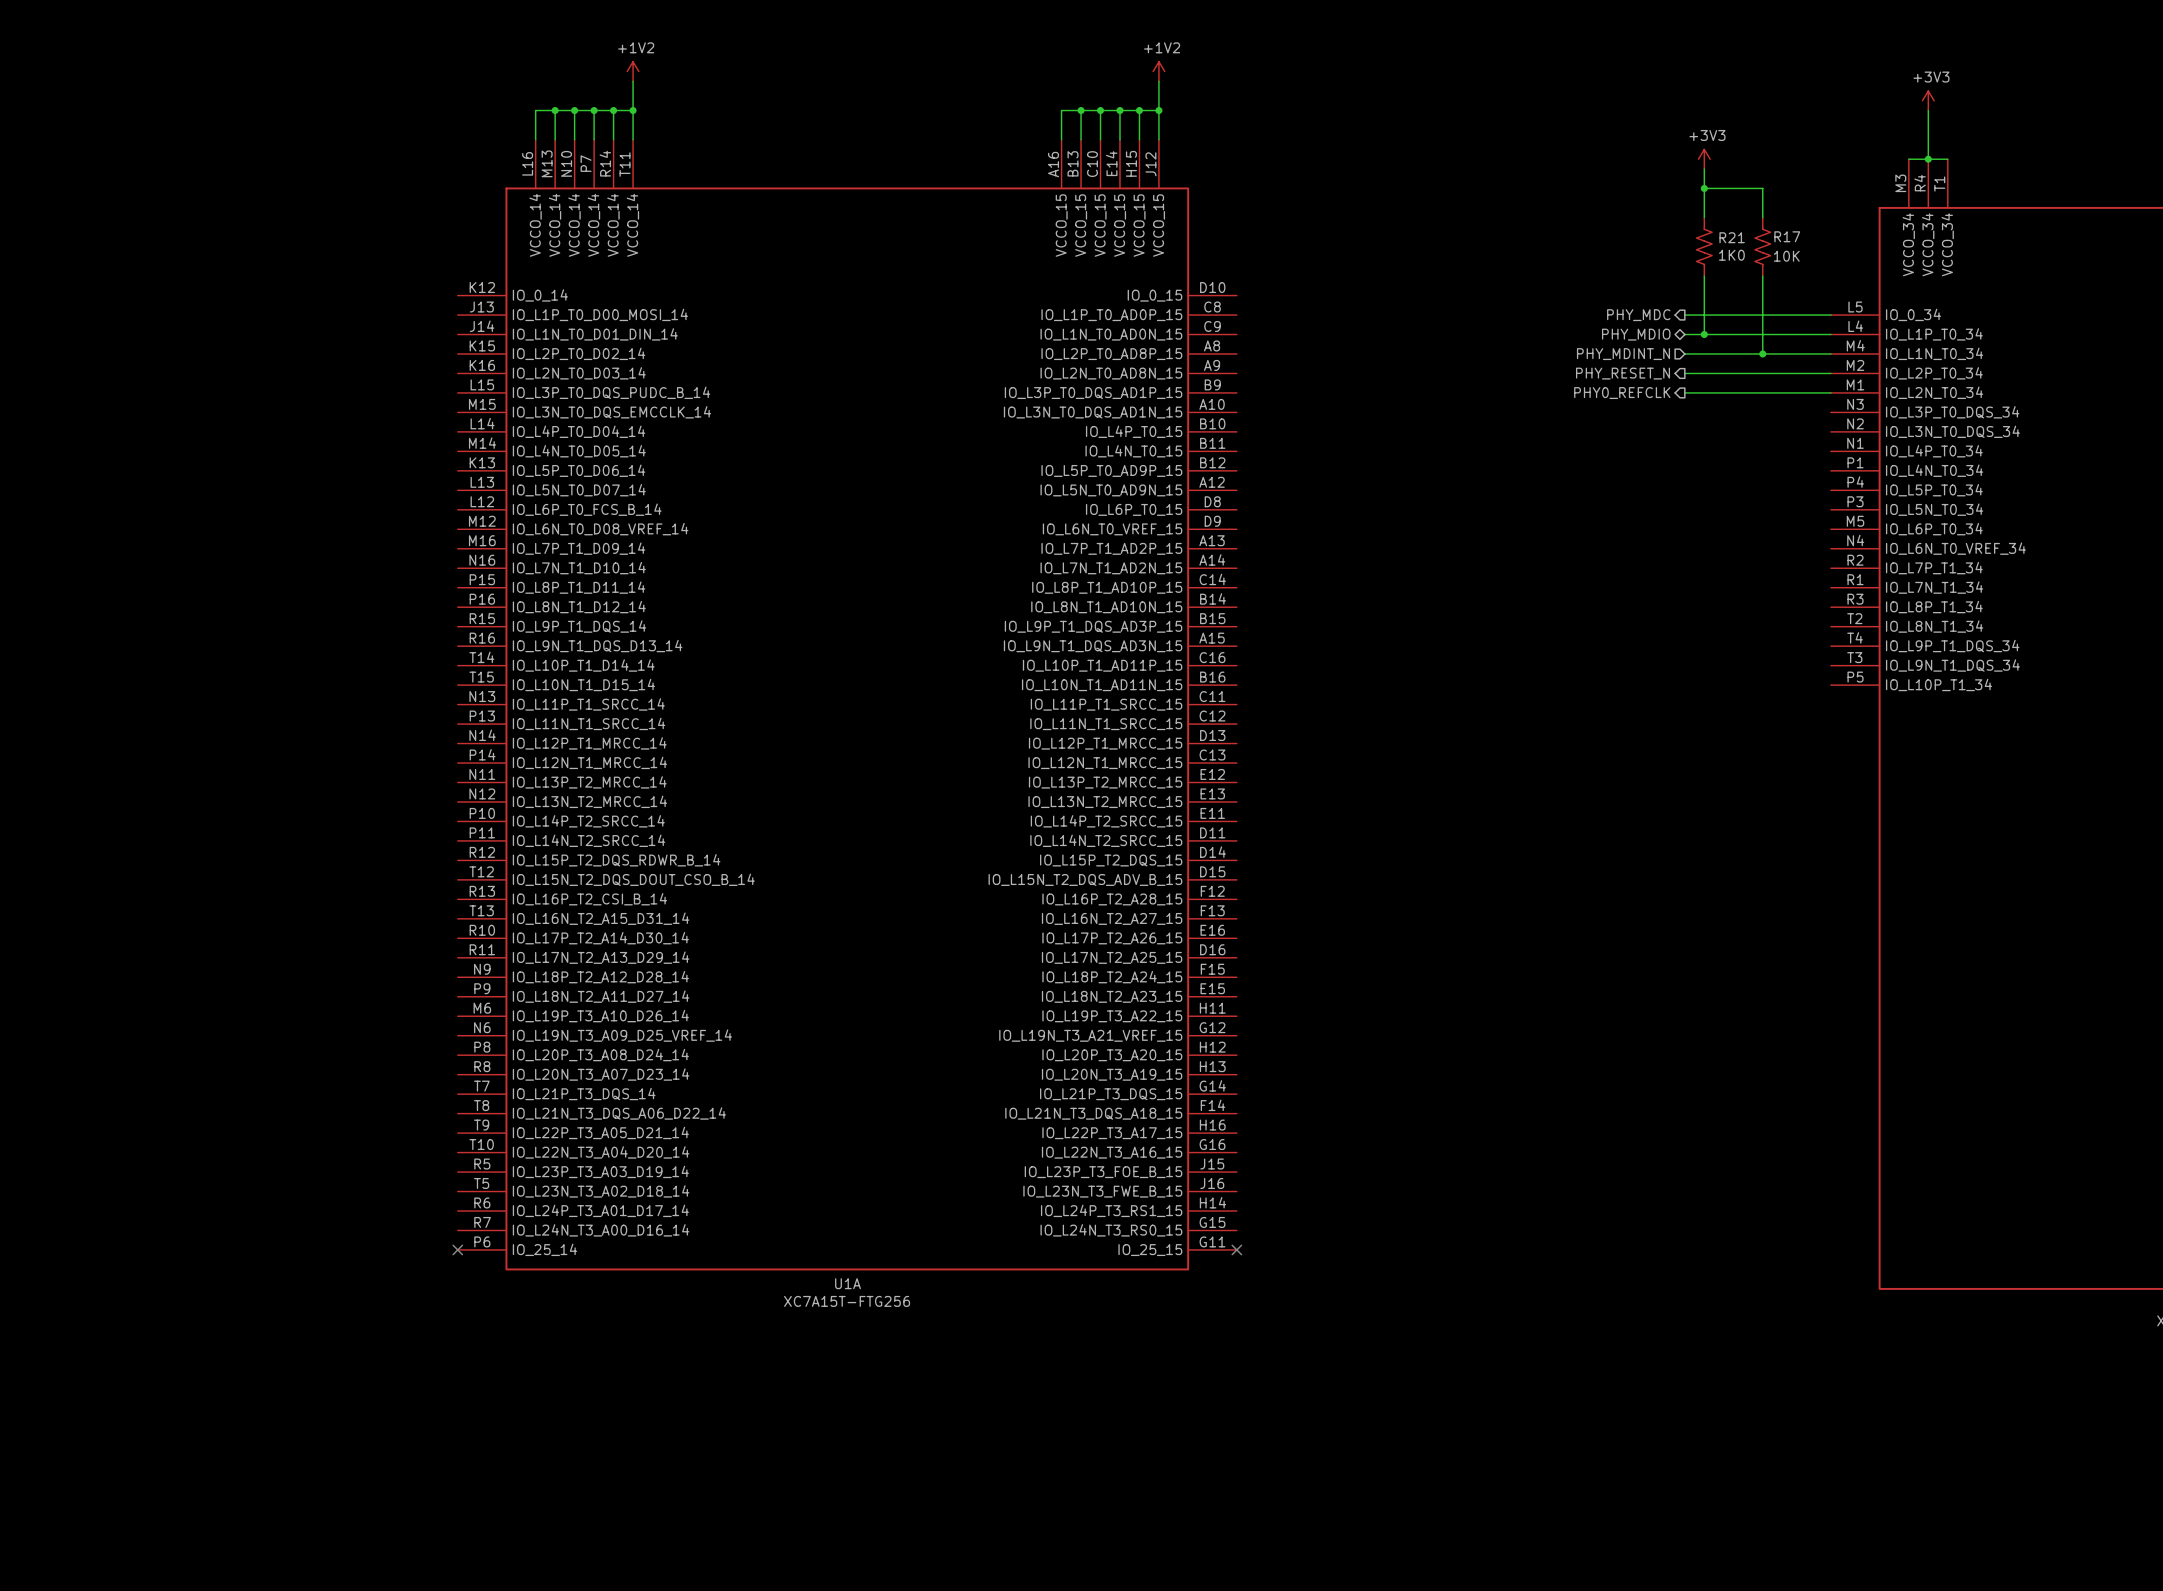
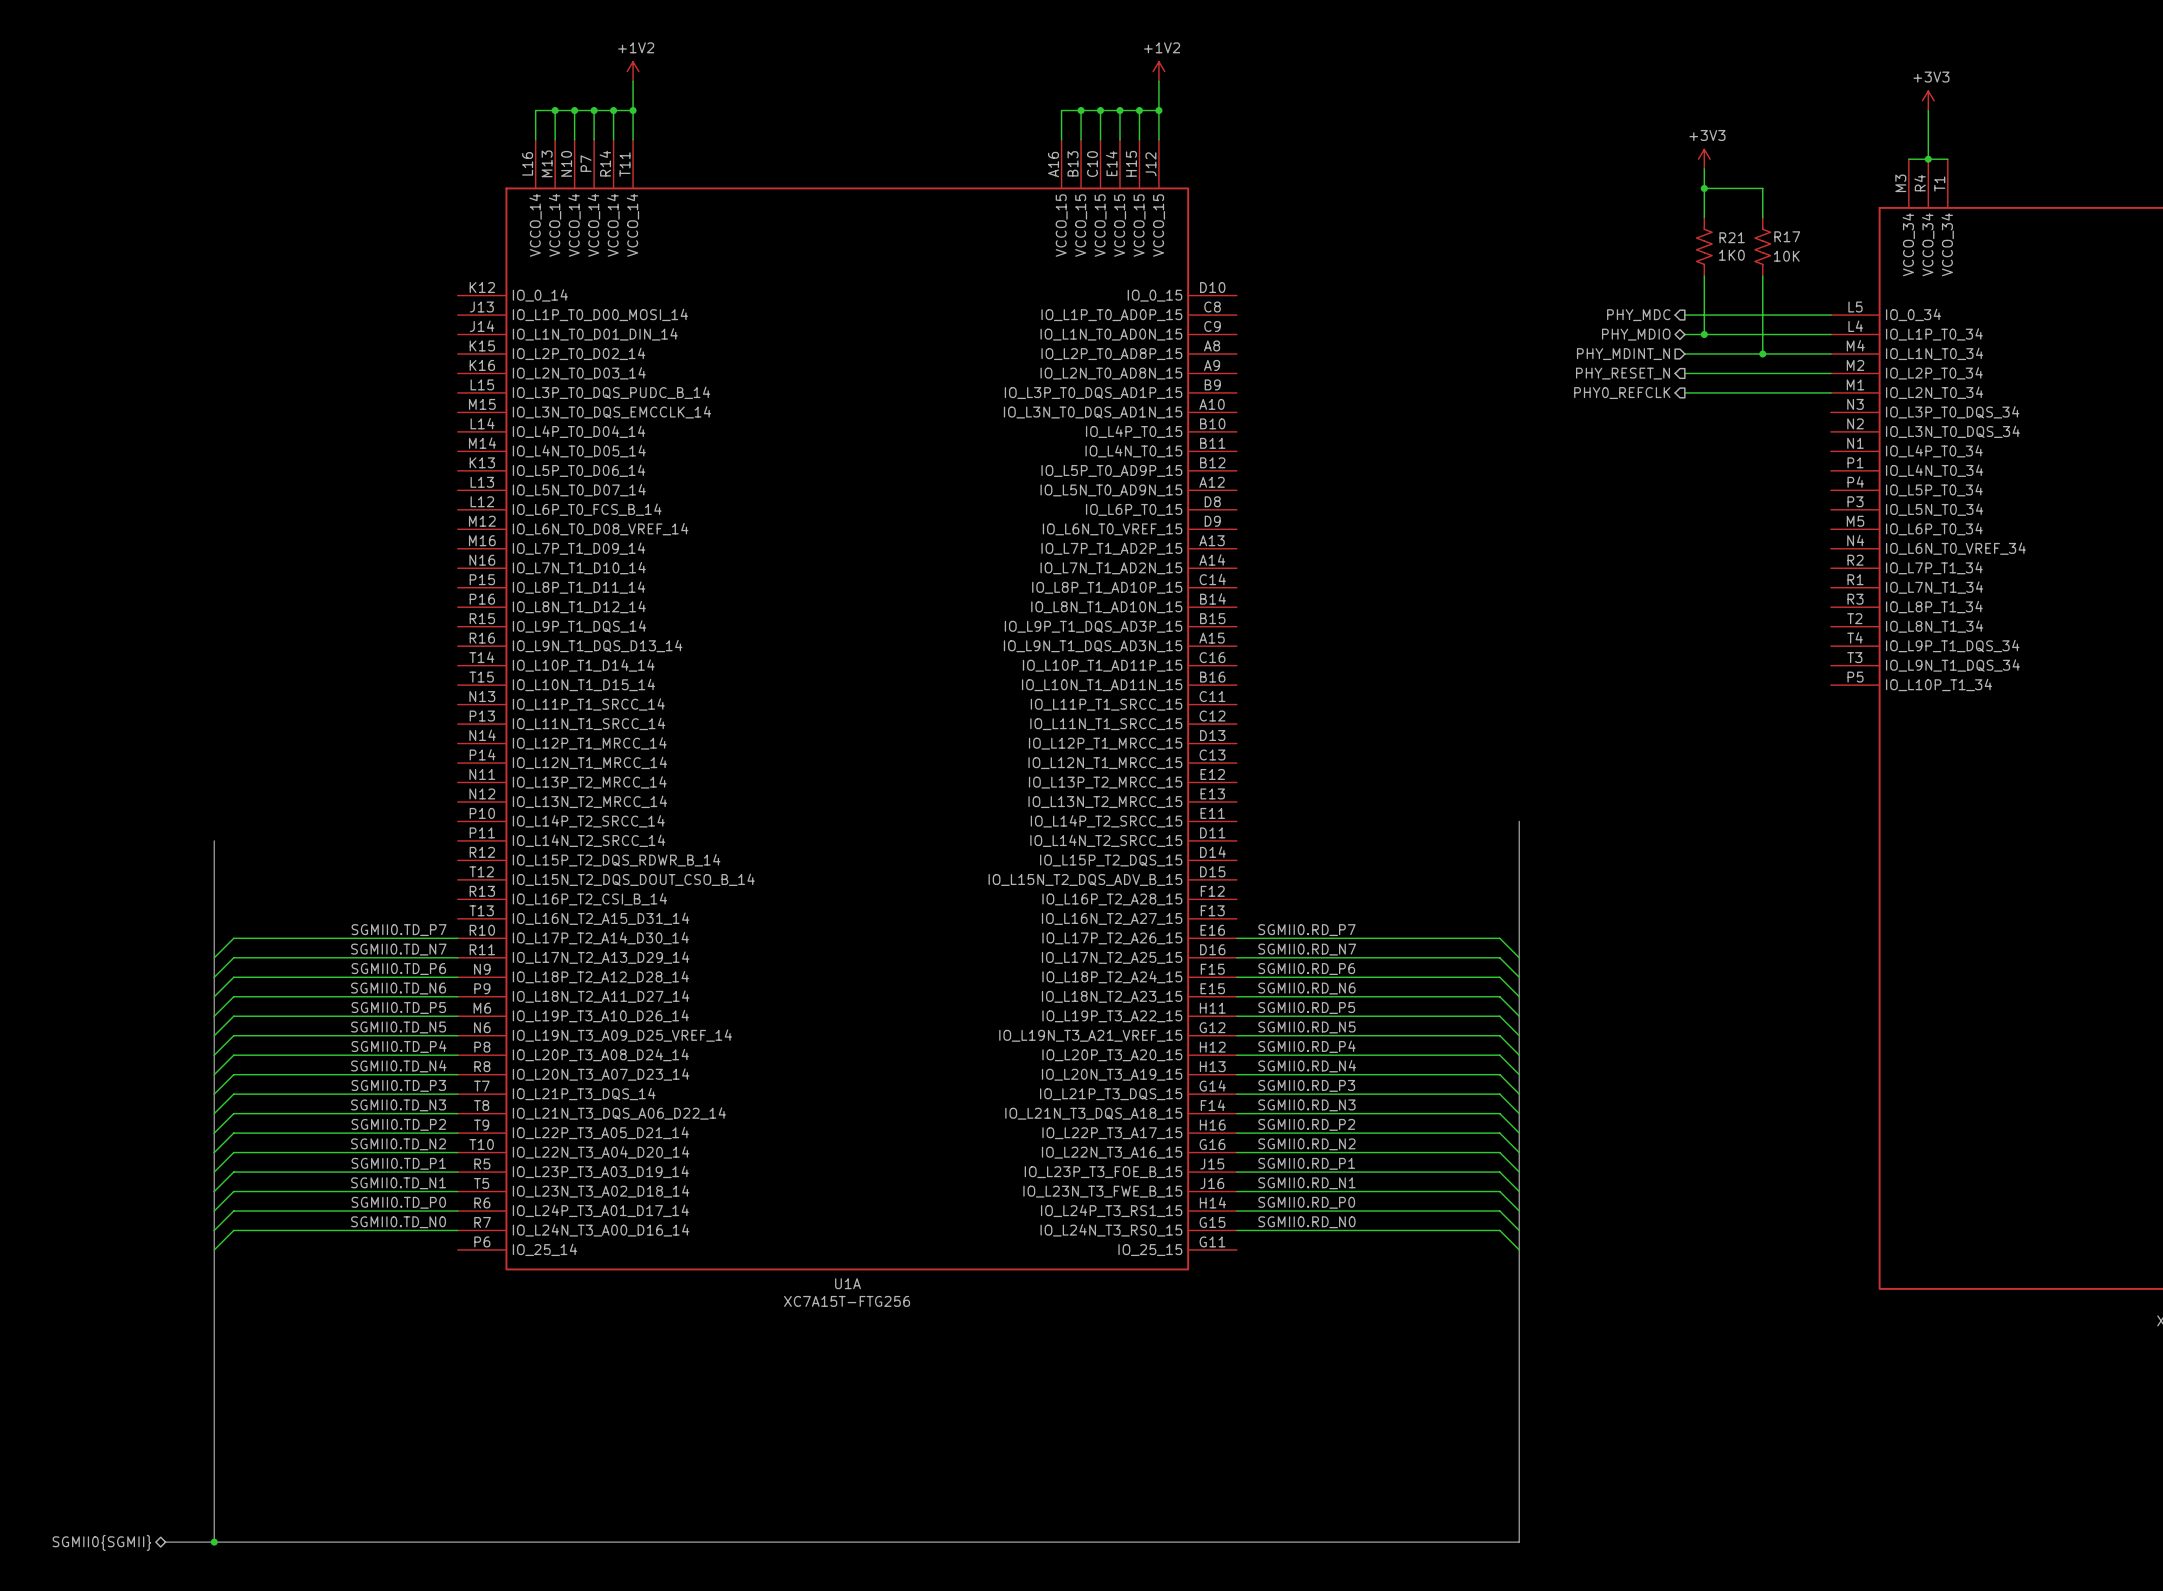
bus: none -> (1519, 821) (1519, 1542) (165, 1542)
bus: none -> (214, 840) (214, 1542)
label: none -> SGMII0.TD_P7 (399, 930)
label: none -> SGMII0.RD_P7 (1306, 930)
wire: none -> (457, 938) (233, 938) (214, 957)
wire: none -> (1236, 938) (1499, 938) (1519, 957)
label: none -> SGMII0.TD_N7 (398, 949)
label: none -> SGMII0.RD_N7 (1307, 949)
wire: none -> (457, 957) (233, 957) (214, 977)
wire: none -> (1236, 957) (1499, 957) (1519, 977)
label: none -> SGMII0.TD_P6 (398, 969)
label: none -> SGMII0.RD_P6 (1306, 969)
wire: none -> (457, 977) (233, 977) (214, 996)
wire: none -> (1236, 977) (1499, 977) (1519, 996)
label: none -> SGMII0.TD_N6 (398, 988)
label: none -> SGMII0.RD_N6 (1306, 988)
wire: none -> (457, 996) (233, 996) (214, 1016)
wire: none -> (1236, 996) (1499, 996) (1519, 1016)
label: none -> SGMII0.TD_P5 (398, 1008)
label: none -> SGMII0.RD_P5 (1306, 1008)
wire: none -> (457, 1016) (233, 1016) (214, 1035)
wire: none -> (1236, 1016) (1499, 1016) (1519, 1035)
label: none -> SGMII0.TD_N5 (398, 1027)
label: none -> SGMII0.RD_N5 (1306, 1027)
wire: none -> (457, 1035) (233, 1035) (214, 1055)
wire: none -> (1236, 1035) (1499, 1035) (1519, 1055)
label: none -> SGMII0.TD_P4 (399, 1046)
label: none -> SGMII0.RD_P4 (1306, 1046)
wire: none -> (457, 1055) (233, 1055) (214, 1074)
wire: none -> (1236, 1055) (1499, 1055) (1519, 1074)
label: none -> SGMII0.TD_N4 (398, 1066)
label: none -> SGMII0.RD_N4 (1307, 1066)
wire: none -> (457, 1074) (233, 1074) (214, 1094)
wire: none -> (1236, 1074) (1499, 1074) (1519, 1094)
label: none -> SGMII0.TD_P3 (398, 1085)
label: none -> SGMII0.RD_P3 (1306, 1085)
wire: none -> (457, 1094) (233, 1094) (214, 1113)
wire: none -> (1236, 1094) (1499, 1094) (1519, 1113)
label: none -> SGMII0.TD_N3 (398, 1105)
label: none -> SGMII0.RD_N3 (1306, 1105)
wire: none -> (457, 1113) (233, 1113) (214, 1133)
wire: none -> (1236, 1113) (1499, 1113) (1519, 1133)
label: none -> SGMII0.TD_P2 (398, 1124)
label: none -> SGMII0.RD_P2 (1306, 1124)
wire: none -> (457, 1133) (233, 1133) (214, 1152)
wire: none -> (1236, 1133) (1499, 1133) (1519, 1152)
label: none -> SGMII0.TD_N2 (398, 1144)
label: none -> SGMII0.RD_N2 (1306, 1144)
wire: none -> (457, 1152) (233, 1152) (214, 1172)
wire: none -> (1236, 1152) (1499, 1152) (1519, 1172)
label: none -> SGMII0.TD_P1 (398, 1163)
label: none -> SGMII0.RD_P1 (1306, 1163)
wire: none -> (457, 1172) (233, 1172) (214, 1191)
wire: none -> (1236, 1172) (1499, 1172) (1519, 1191)
label: none -> SGMII0.TD_N1 (398, 1183)
label: none -> SGMII0.RD_N1 (1306, 1183)
wire: none -> (457, 1191) (233, 1191) (214, 1211)
wire: none -> (1236, 1191) (1499, 1191) (1519, 1211)
label: none -> SGMII0.TD_P0 (398, 1202)
label: none -> SGMII0.RD_P0 (1306, 1202)
wire: none -> (457, 1211) (233, 1211) (214, 1230)
wire: none -> (1236, 1211) (1499, 1211) (1519, 1230)
label: none -> SGMII0.TD_N0 (398, 1222)
label: none -> SGMII0.RD_N0 (1306, 1222)
wire: none -> (457, 1230) (233, 1230) (214, 1249)
wire: none -> (1236, 1230) (1499, 1230) (1519, 1249)
no-connect mark: (457, 1249) -> none
no-connect mark: (1236, 1249) -> none
hierarchical label: none -> SGMII0{SGMII} (101, 1542)
junction: none -> (214, 1542)

